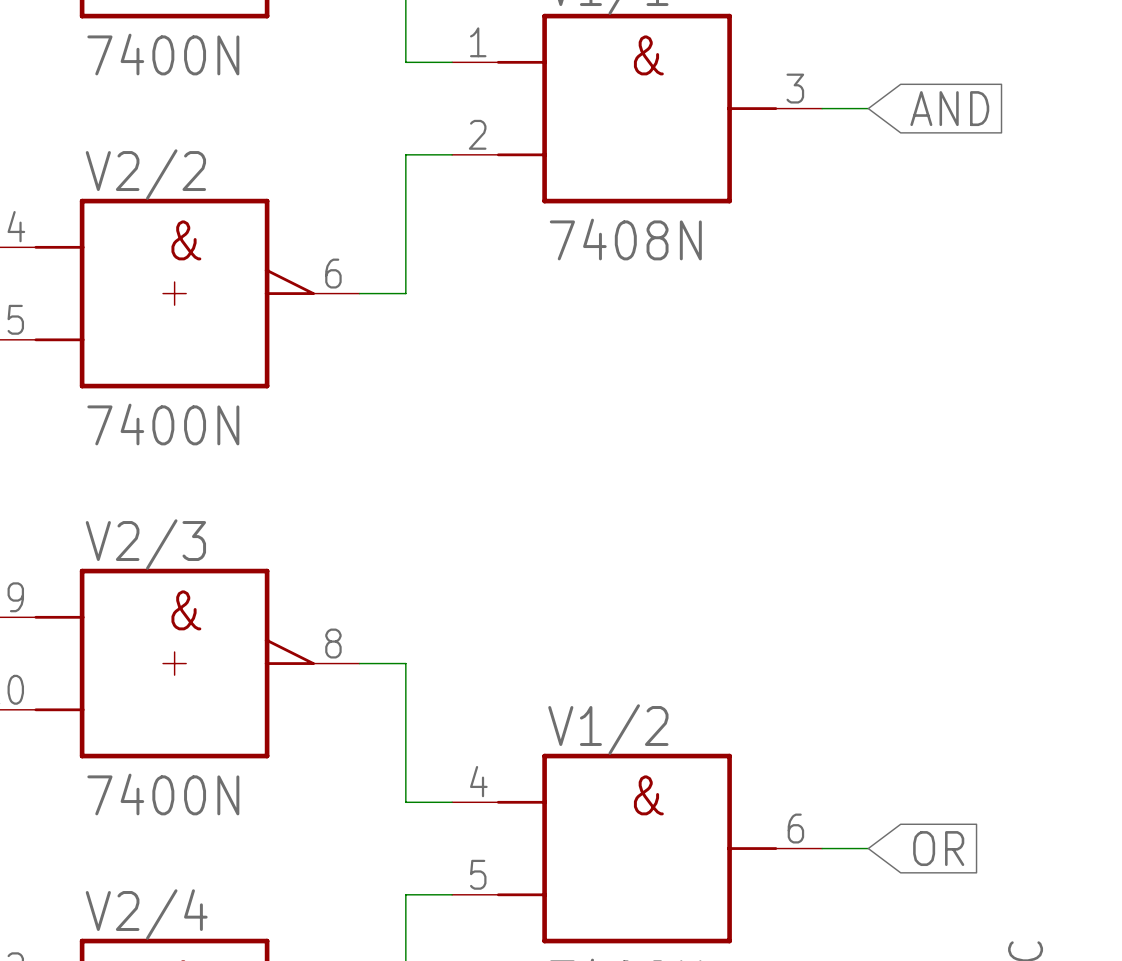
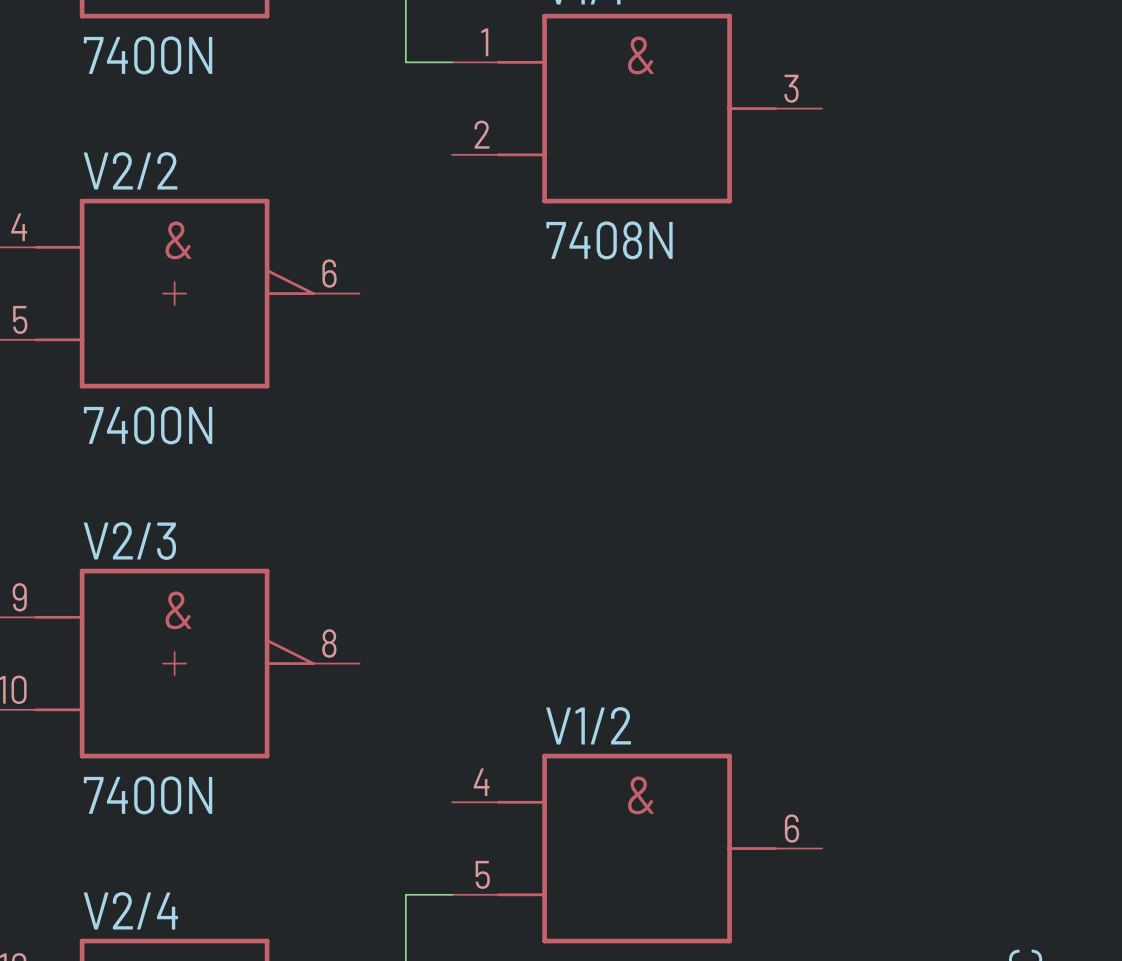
wire: (822, 108) (868, 108) -> none
global label: AND (949, 108) -> none
wire: (452, 154) (405, 154) (405, 293) (359, 293) -> none
wire: (359, 663) (405, 663) (405, 802) (452, 802) -> none
wire: (822, 848) (868, 848) -> none
global label: OR (938, 848) -> none

